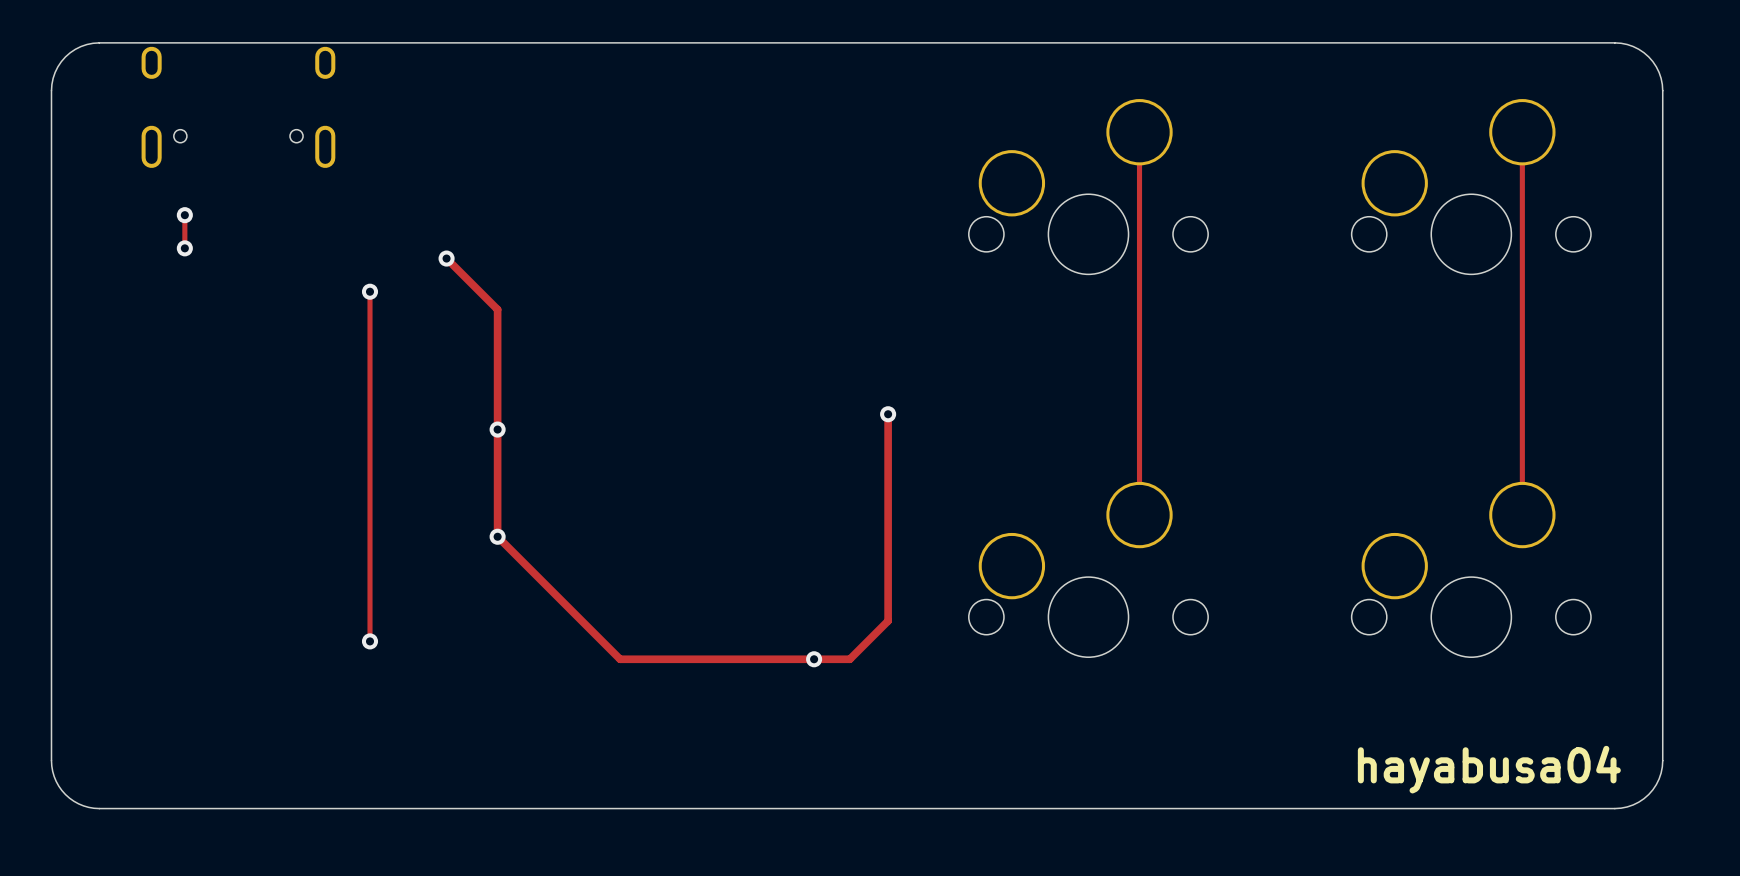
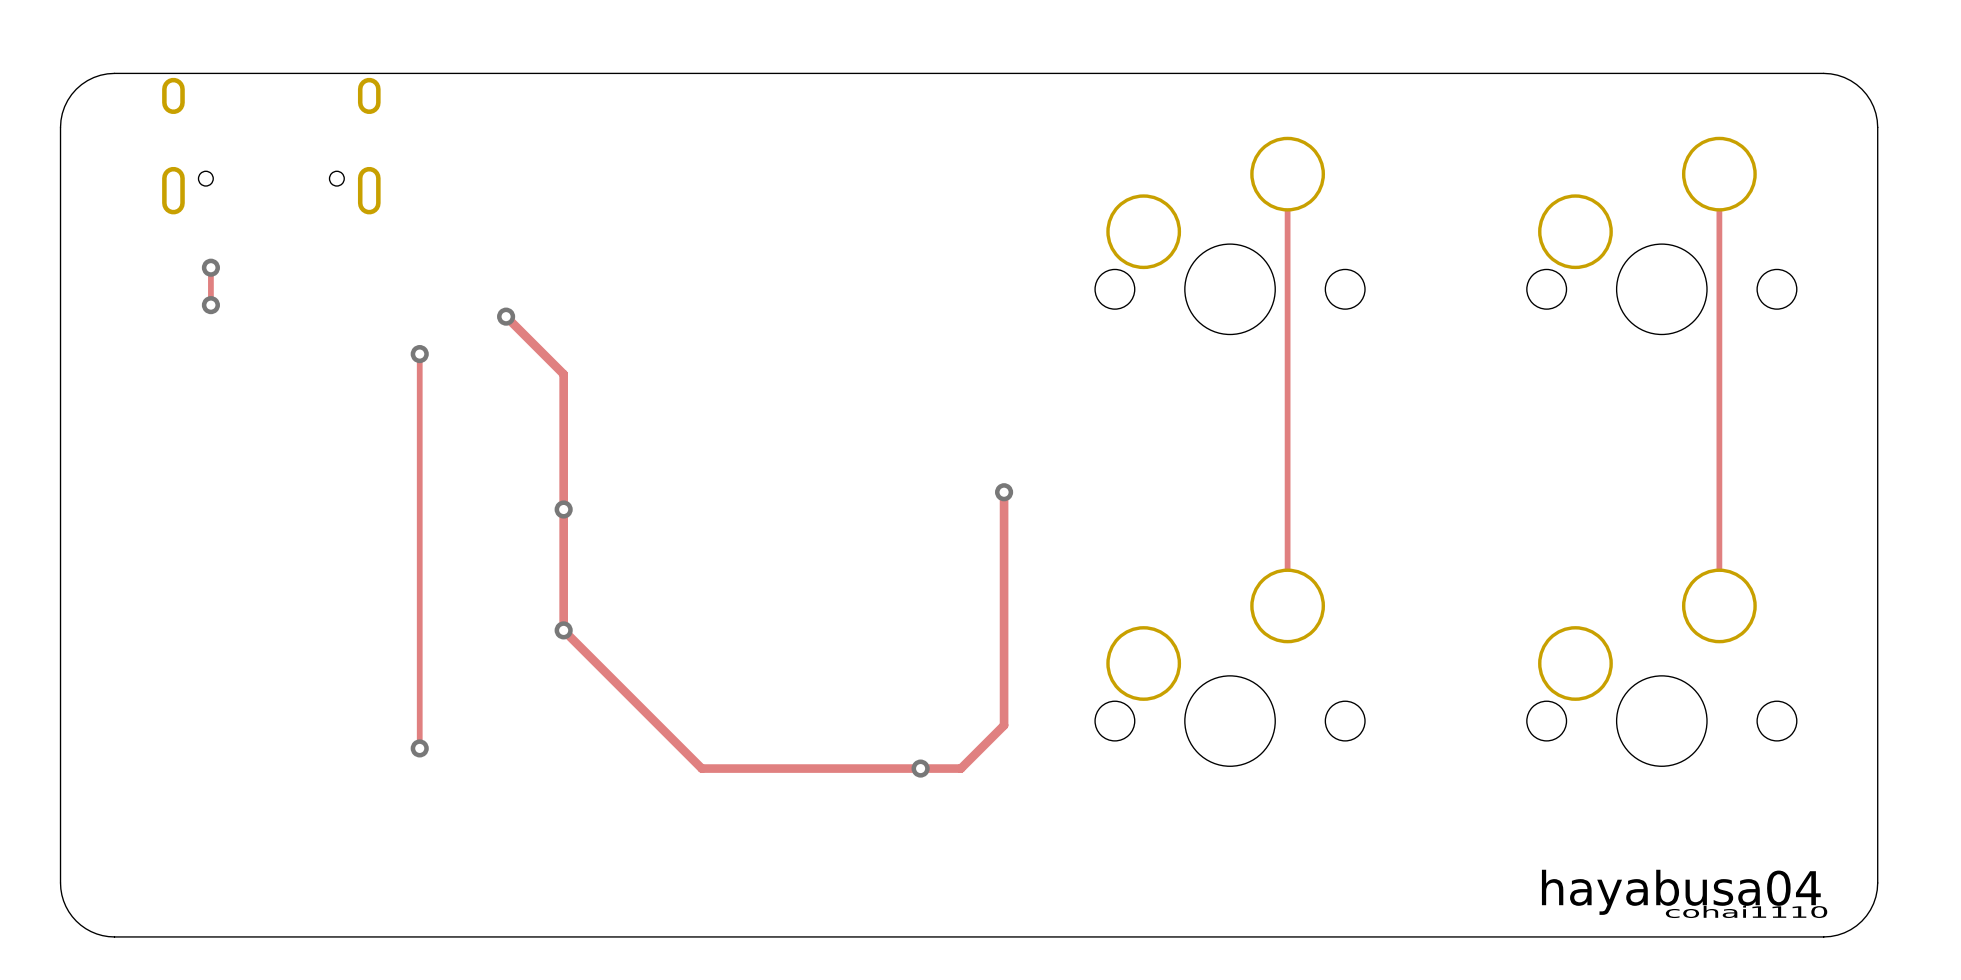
text: none -> cohai1110 (1746, 911)

